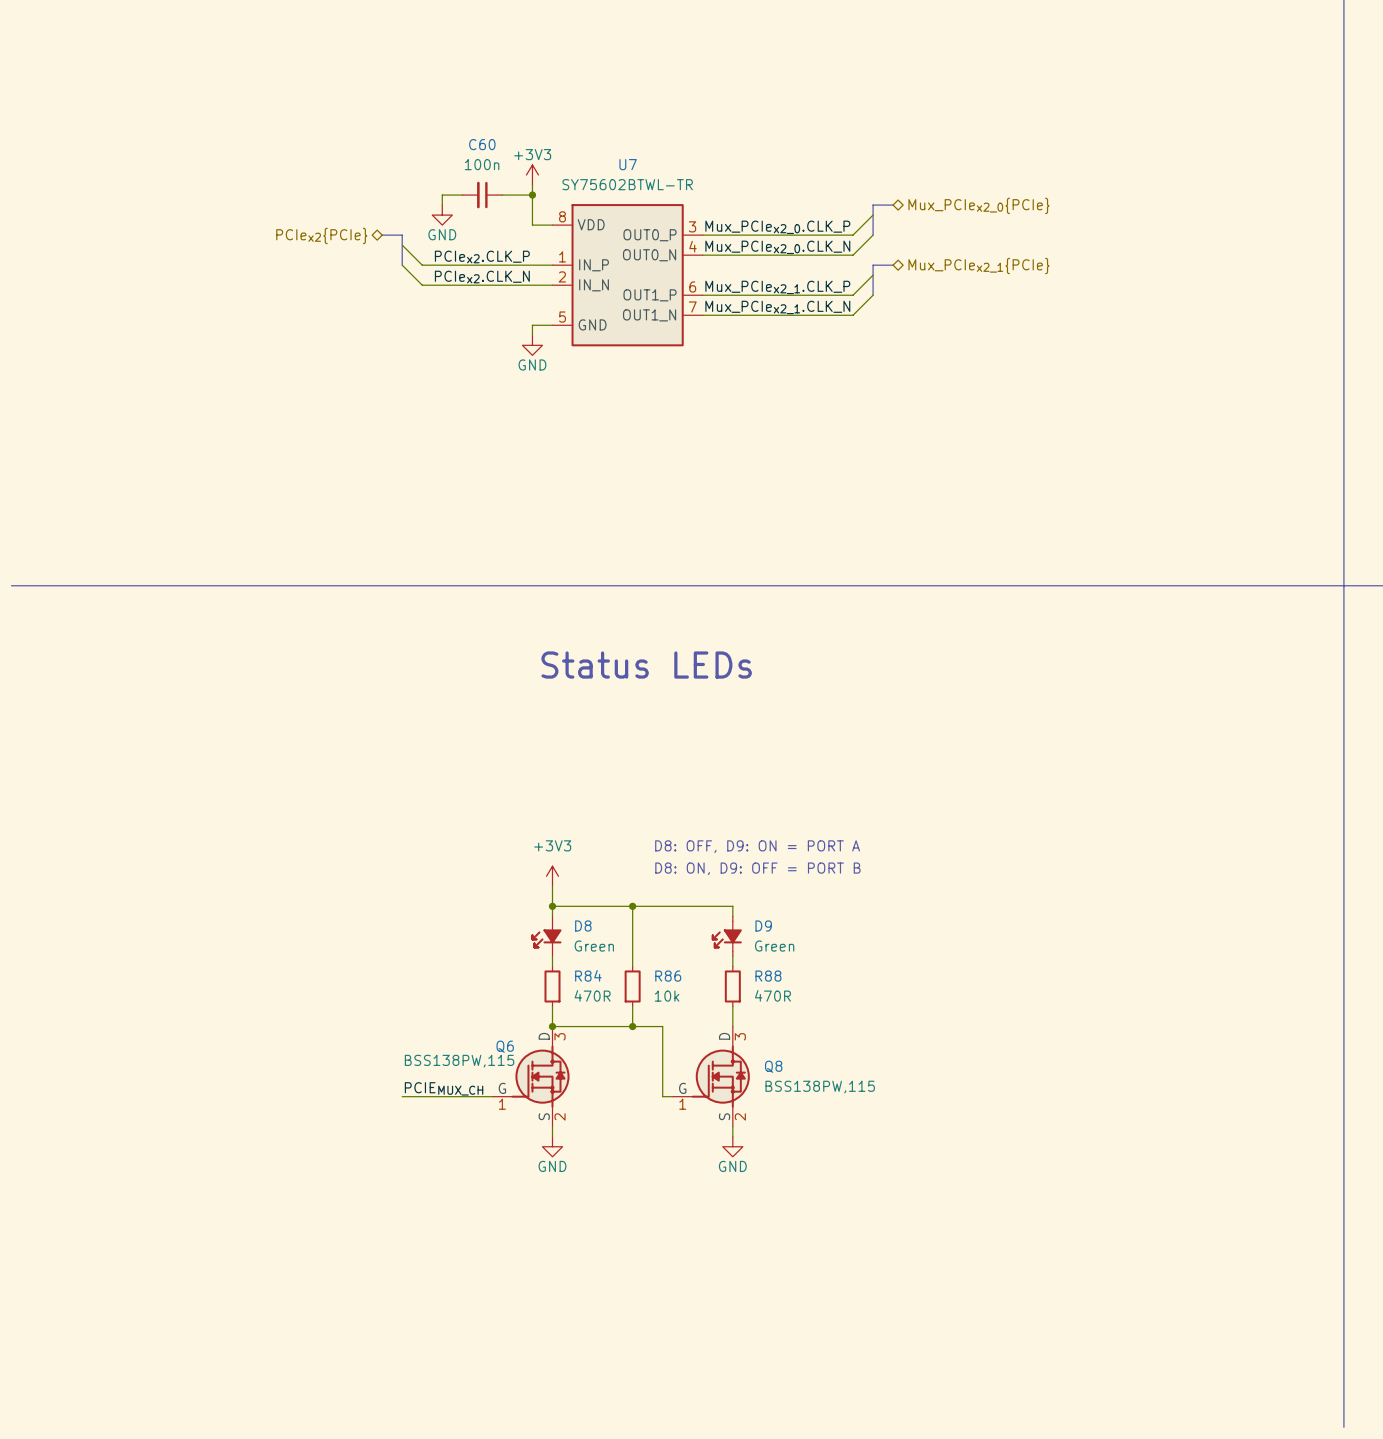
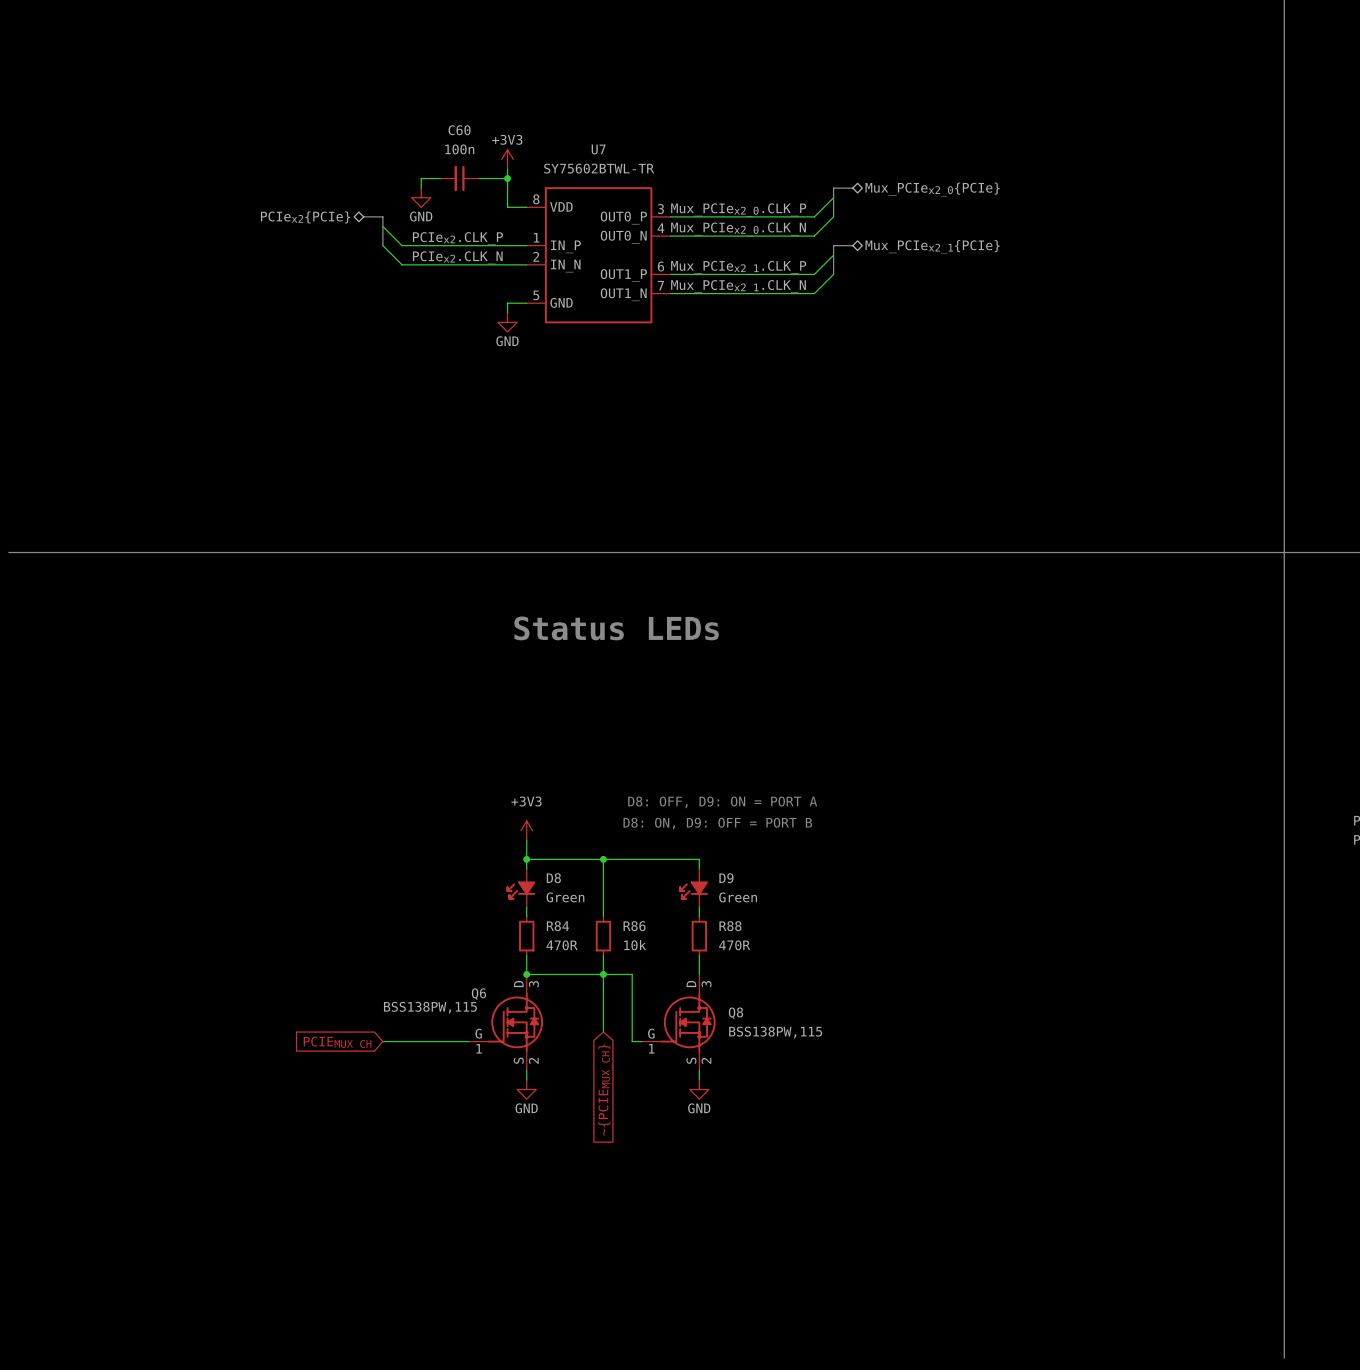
wire: none -> (603, 974) (603, 1031)
label: PCIEMUX_CH (444, 1088) -> none
global label: none -> PCIEMUX_CH (337, 1043)
global label: none -> ~{PCIEMUX_CH} (605, 1089)

